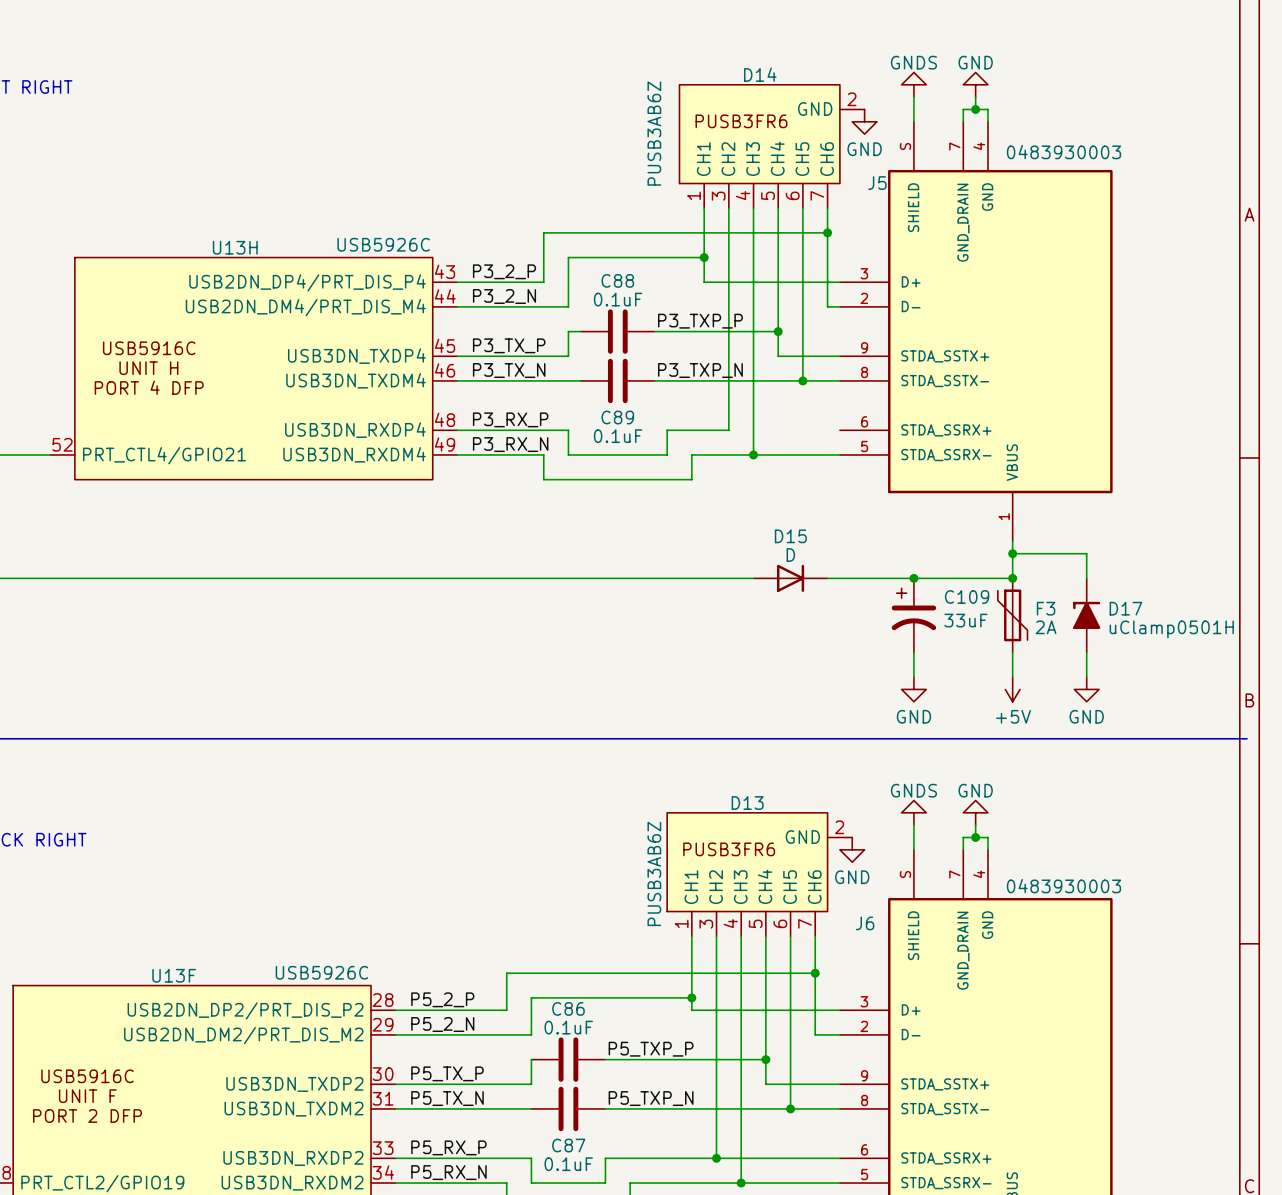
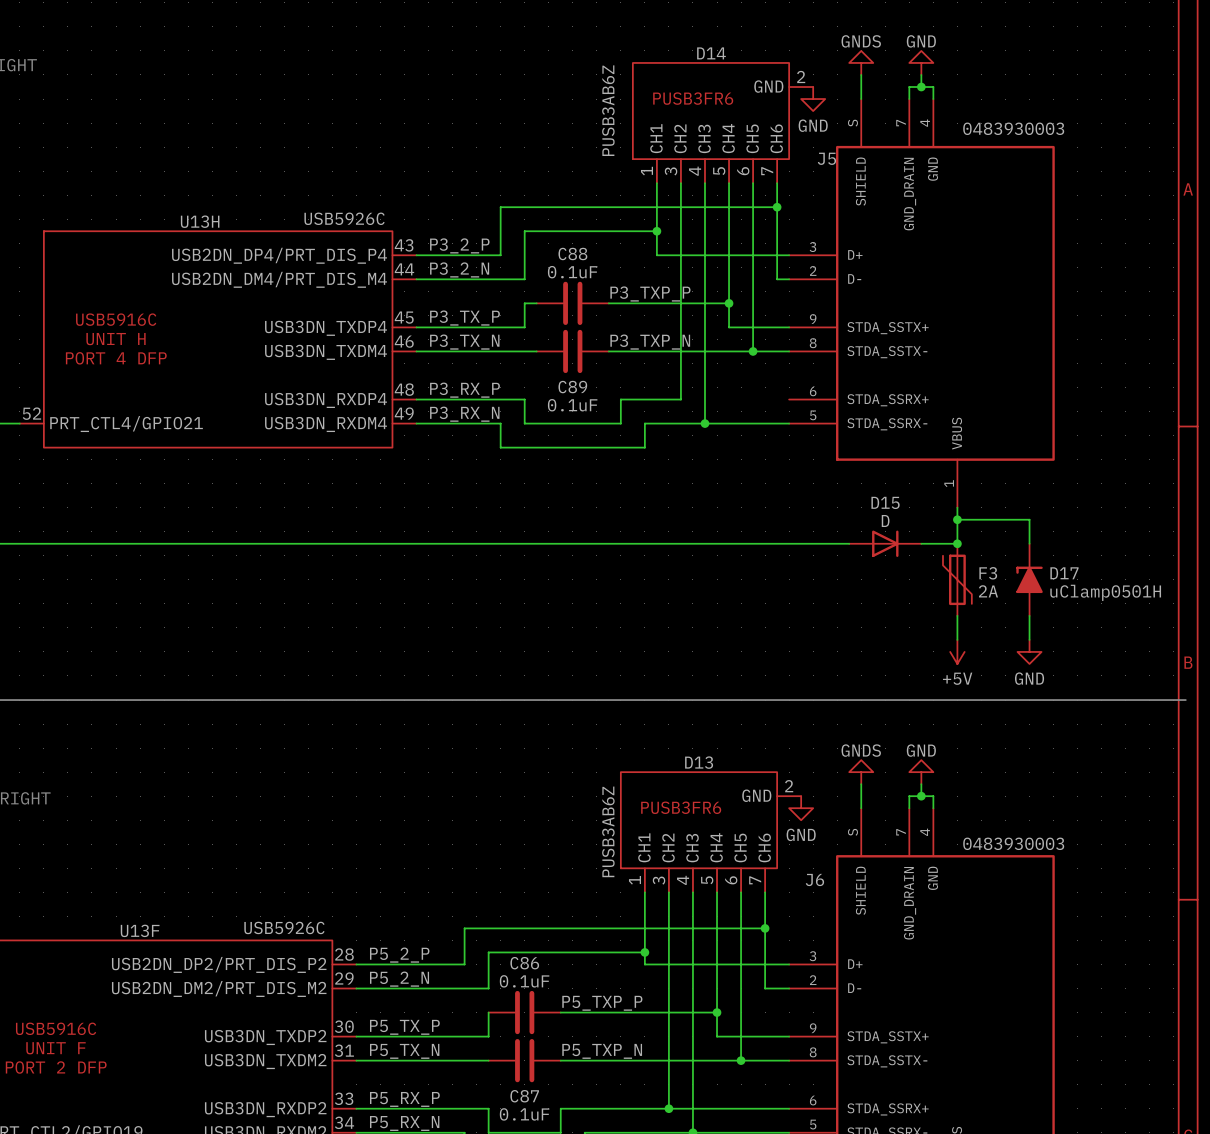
D15 position: (790, 578) -> (885, 543)
junction: (913, 578) -> none
C109: 33uF (913, 615) -> none
wire: (913, 652) (913, 677) -> none
power symbol: GND (913, 689) -> none

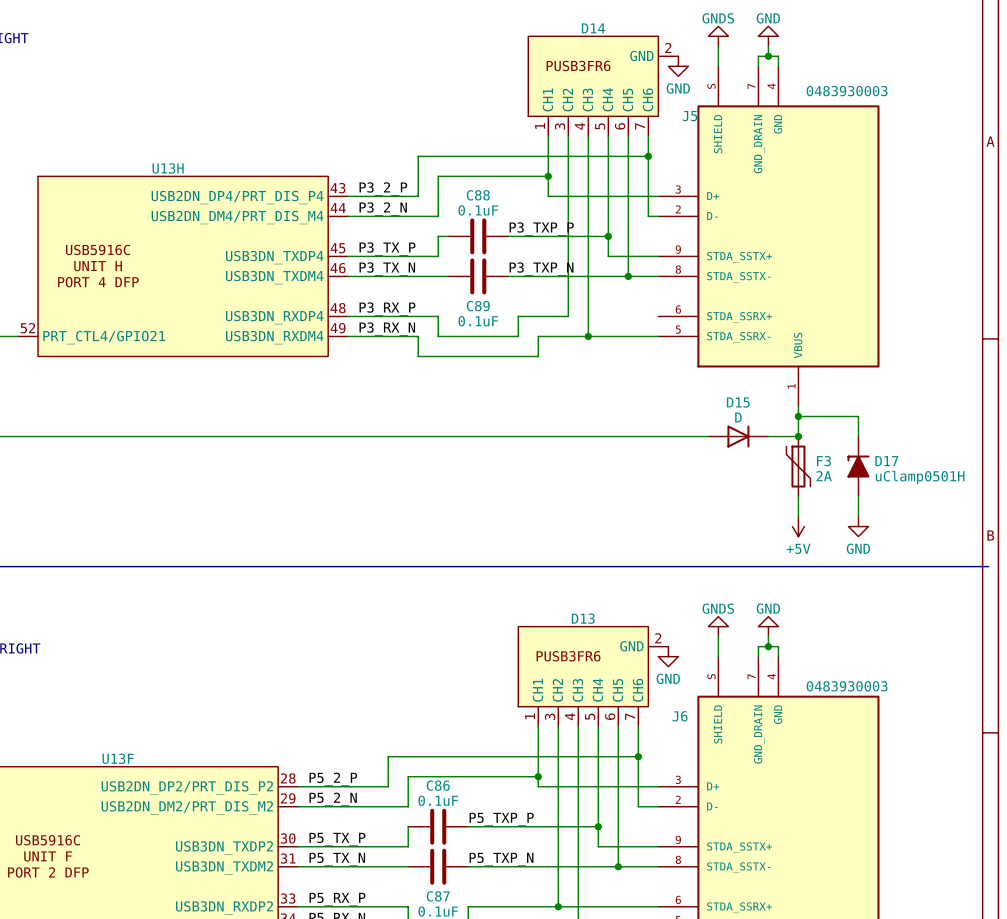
D14 value: PUSB3AB6Z (608, 110) -> none
U13H value: USB5926C (344, 218) -> none
D13 value: PUSB3AB6Z (608, 831) -> none
U13F value: USB5926C (284, 927) -> none

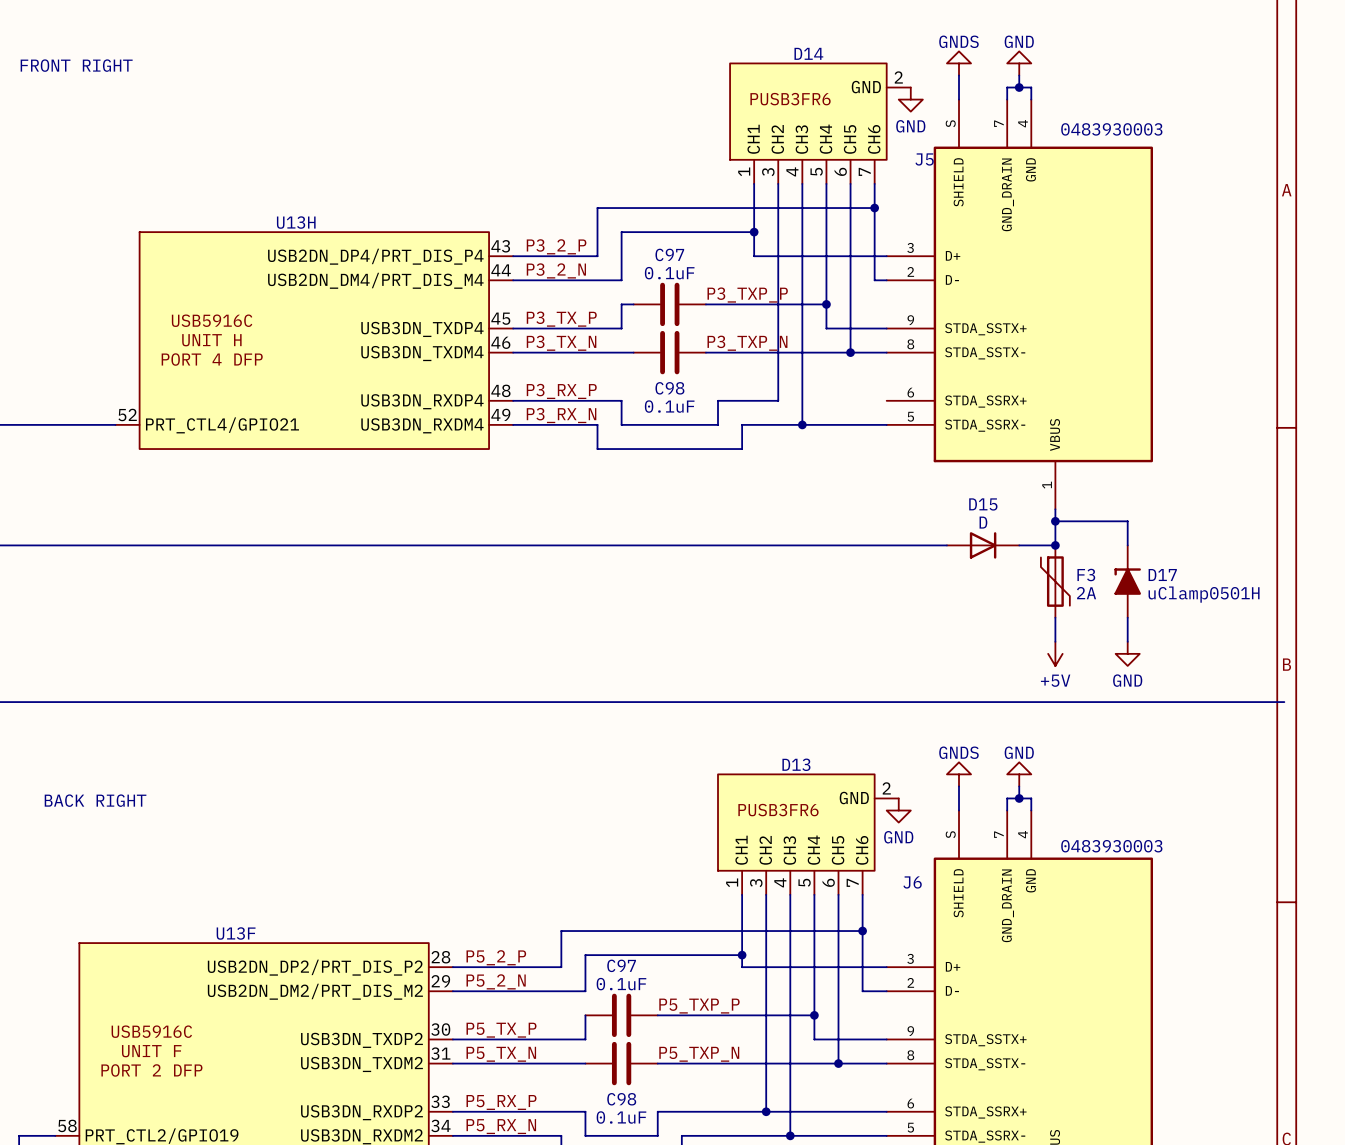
C88 name: C88 (478, 195) -> C97 (669, 254)
C89 name: C89 (478, 306) -> C98 (669, 388)
C86 name: C86 (438, 785) -> C97 (621, 965)
C87 name: C87 (438, 896) -> C98 (621, 1099)

